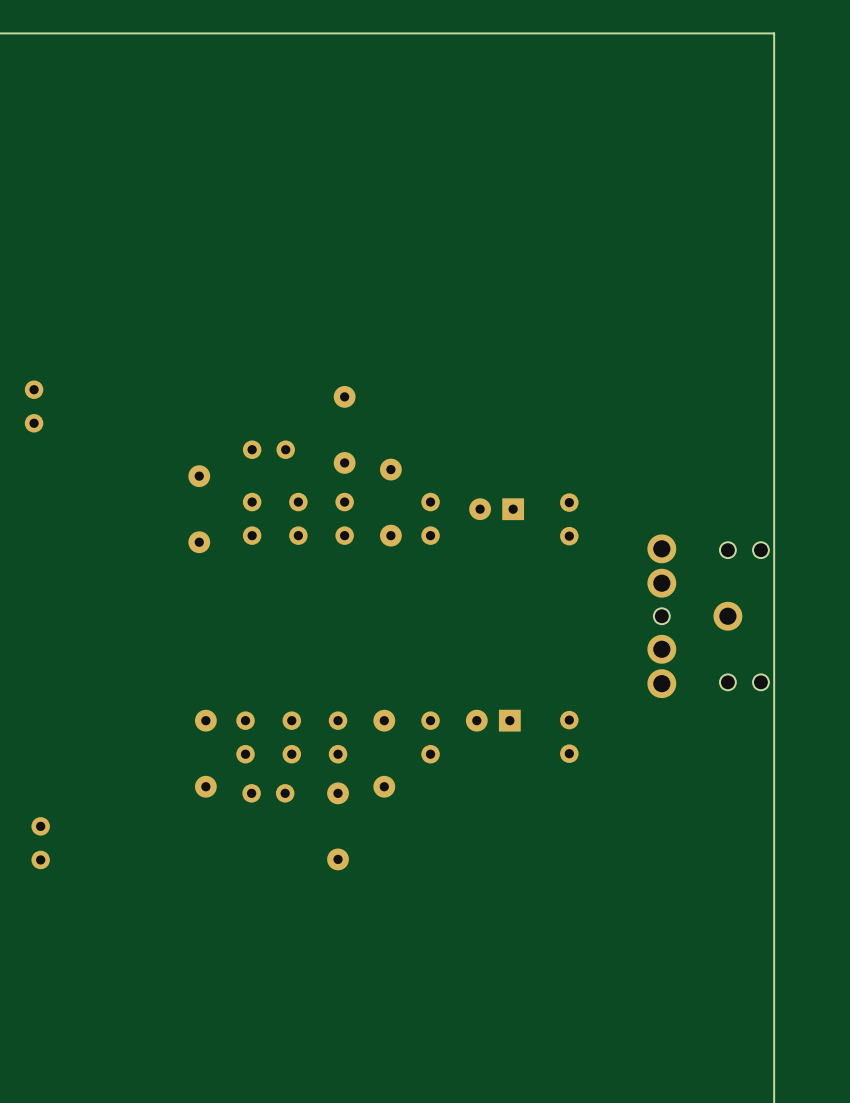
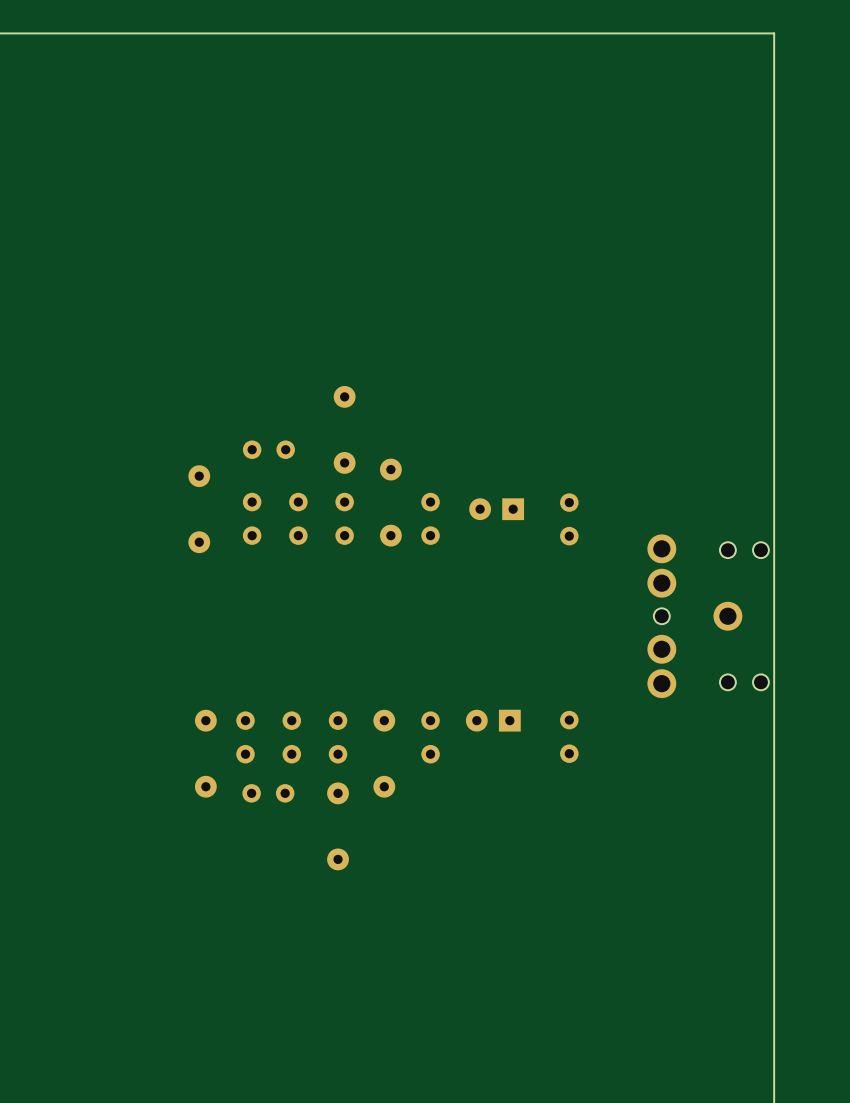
part: (34, 406) -> none
part: (40, 843) -> none

